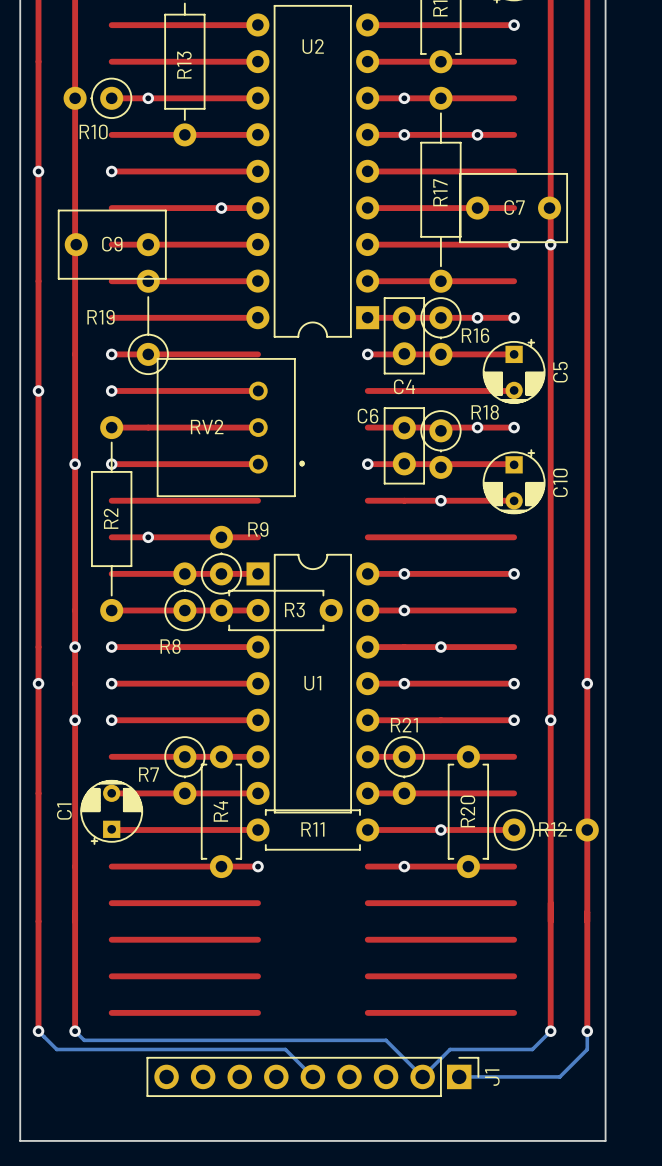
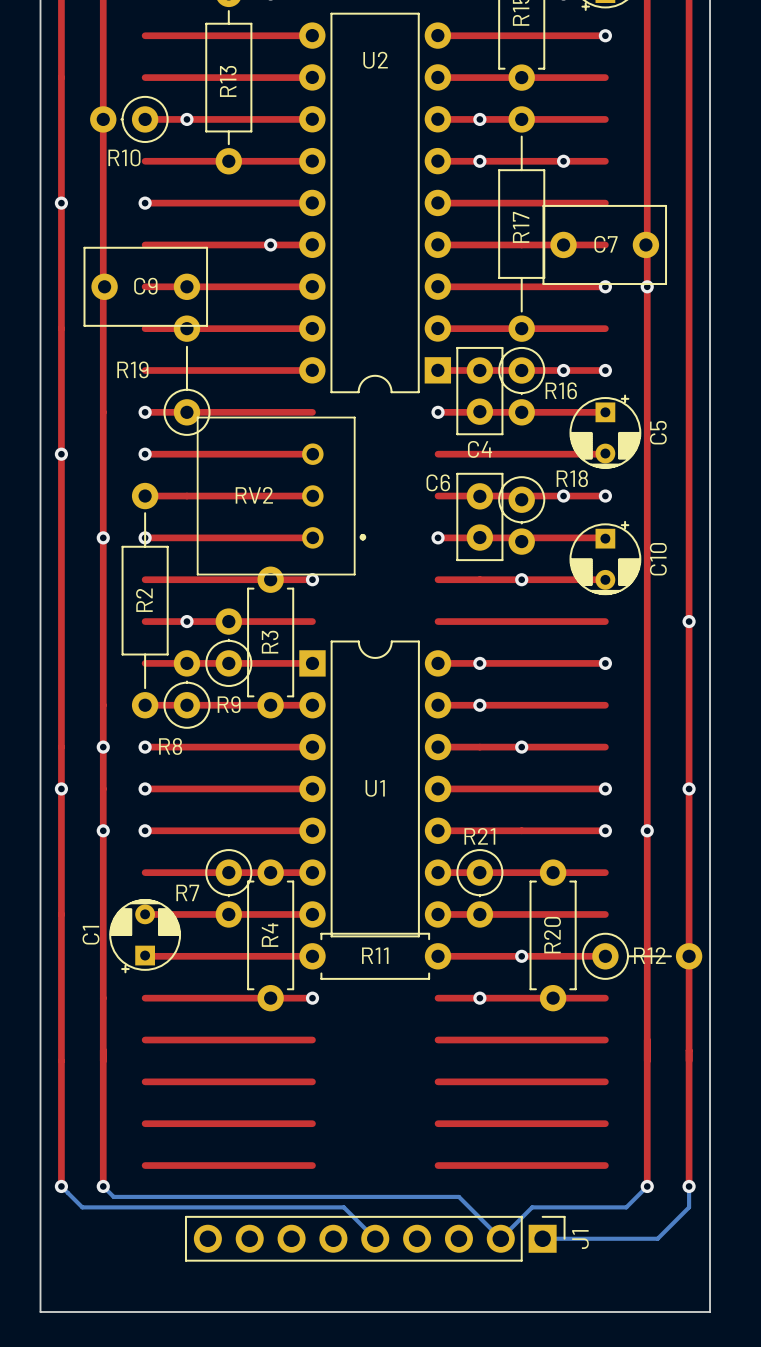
via: none -> (312, 579)
R9 name position: R9 (258, 529) -> R9 (229, 704)
via: none -> (689, 621)
R9 position: (221, 560) -> (228, 647)
R8 position: (184, 596) -> (186, 689)
R3 rotation: 0° (276, 610) -> 90° clockwise (270, 642)
via: (404, 683) -> none

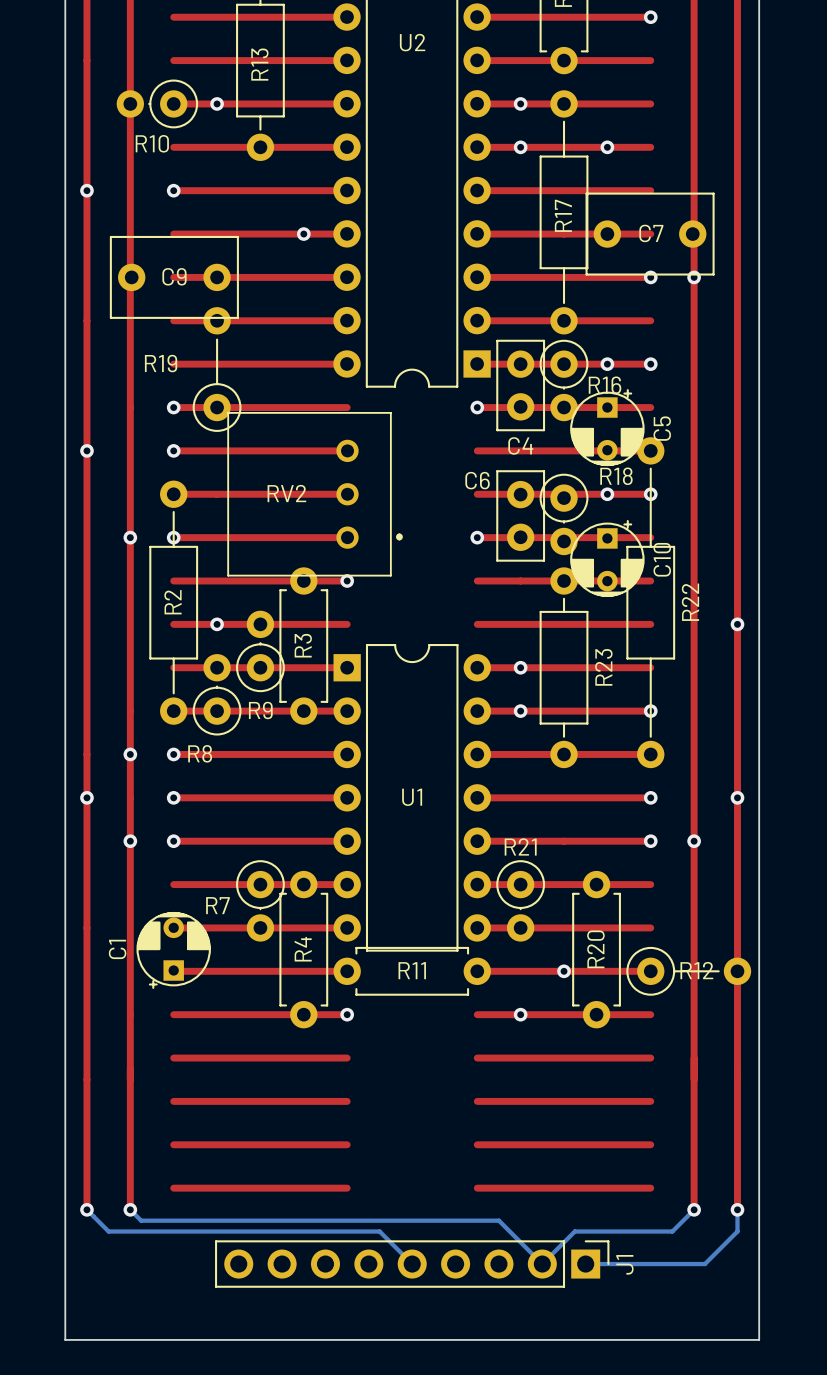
C5 position: (605, 431) -> (607, 427)
C10 position: (605, 558) -> (607, 558)
via: (521, 579) -> none
R22: none -> (650, 602)
R23: none -> (564, 667)
via position: (605, 663) -> (650, 711)
via: (521, 747) -> none

